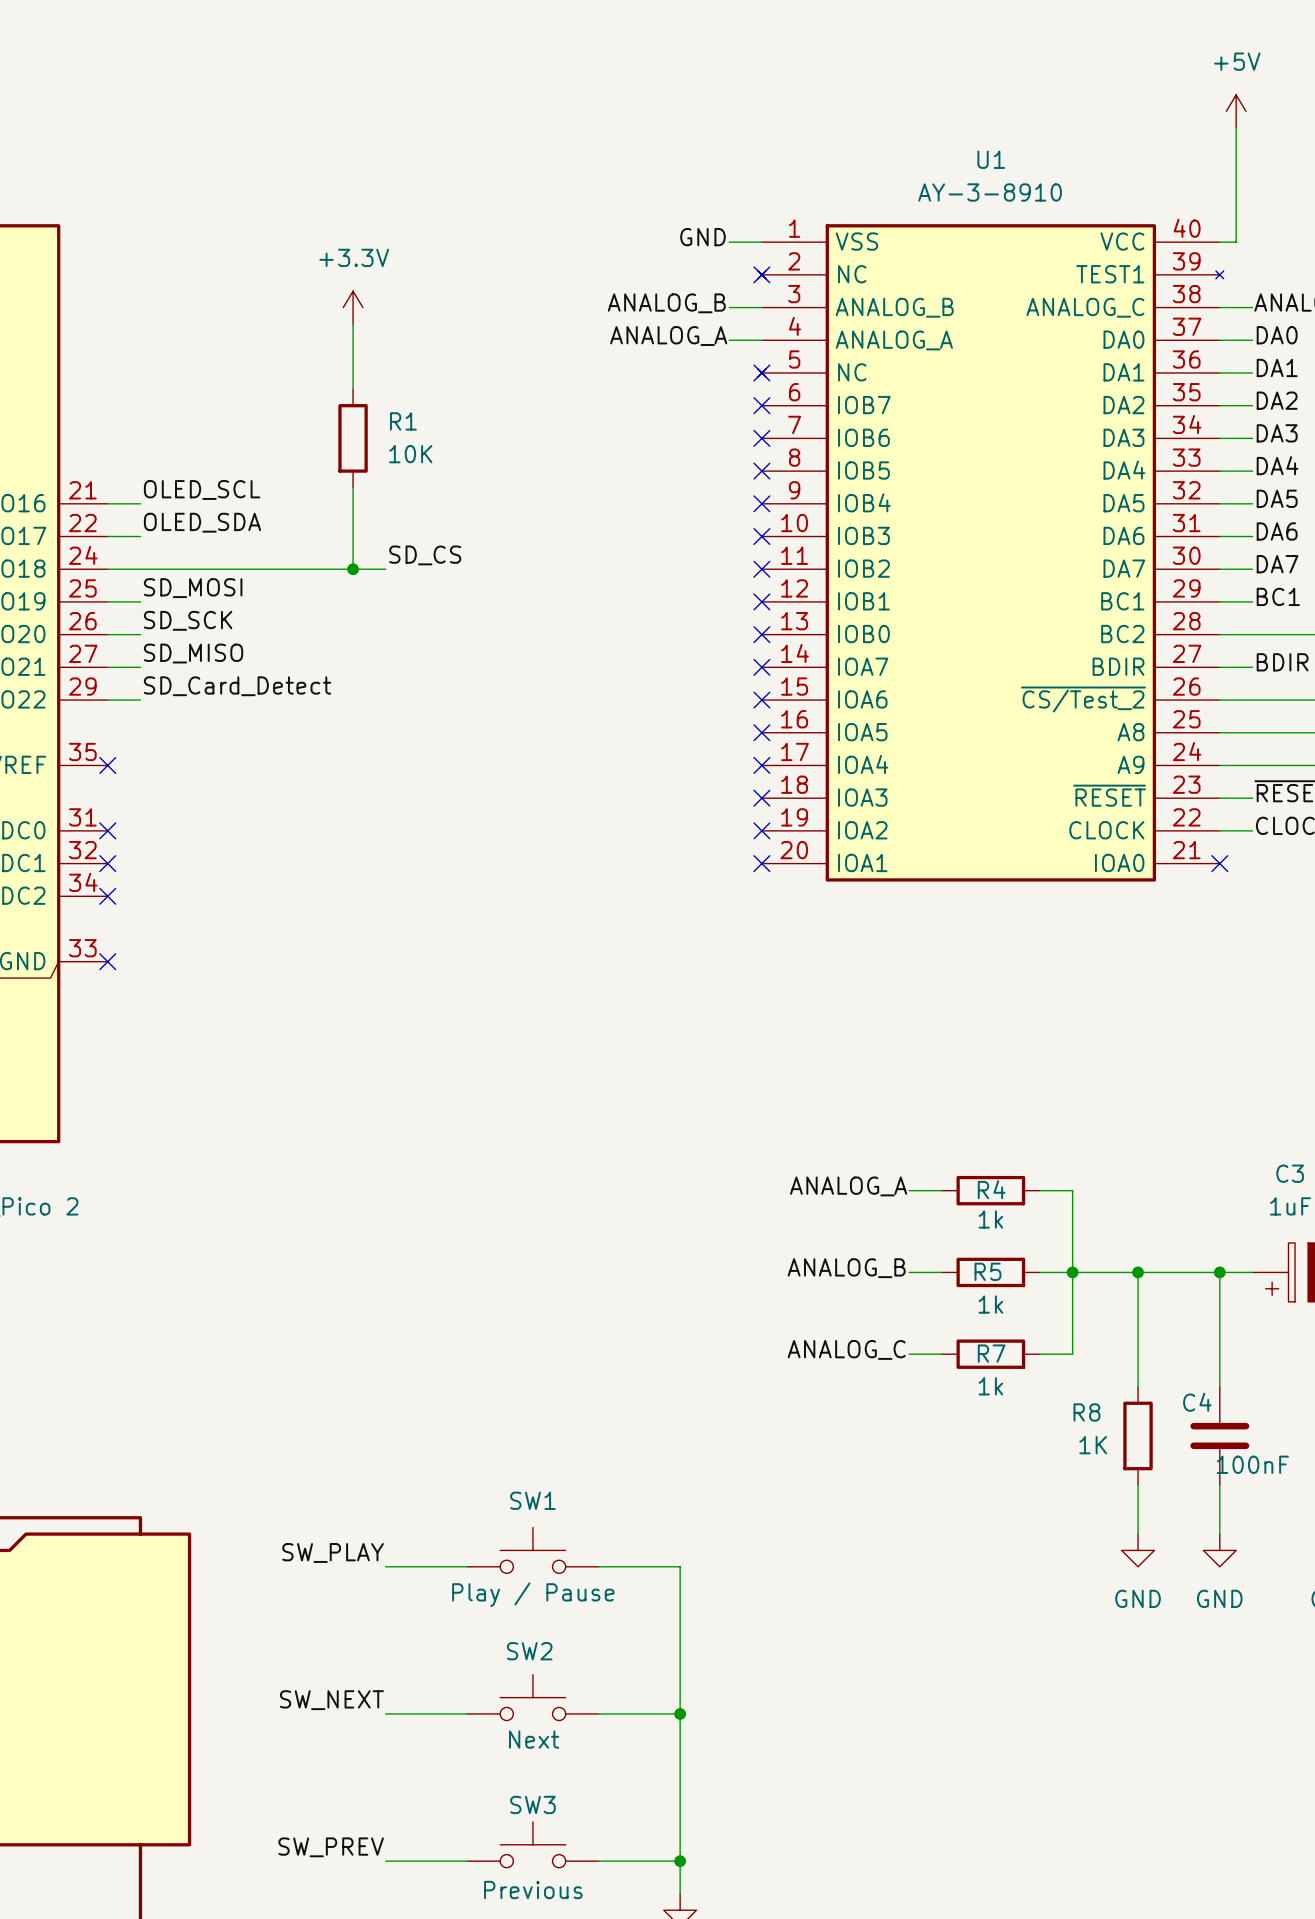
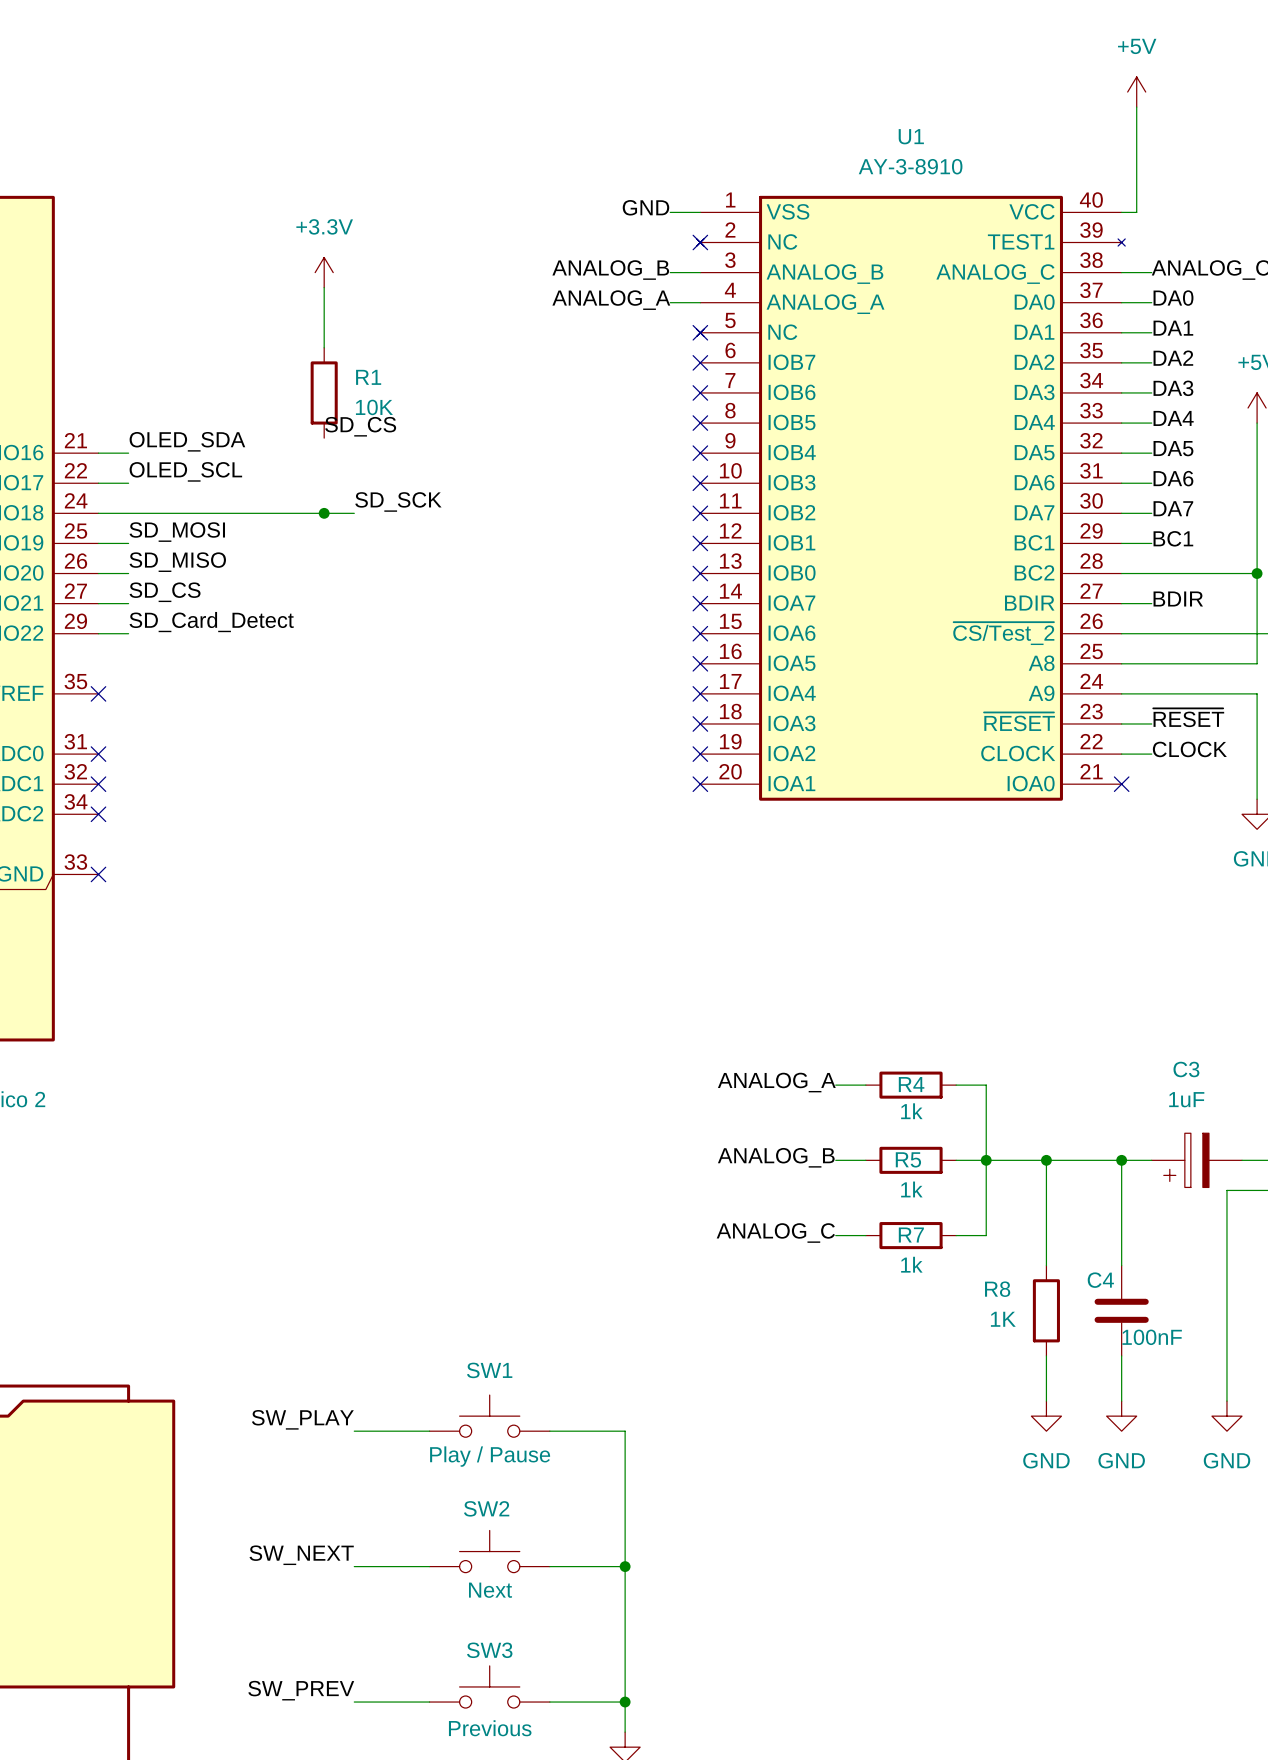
label: none -> SD_CS (360, 426)
wire: (353, 487) (353, 569) -> none
label: OLED_SCL (202, 489) -> OLED_SDA (187, 441)
label: OLED_SDA (202, 522) -> OLED_SCL (185, 471)
label: SD_CS (425, 555) -> SD_SCK (398, 501)
label: SD_SCK (188, 620) -> SD_MISO (177, 562)
label: SD_MISO (193, 653) -> SD_CS (165, 592)

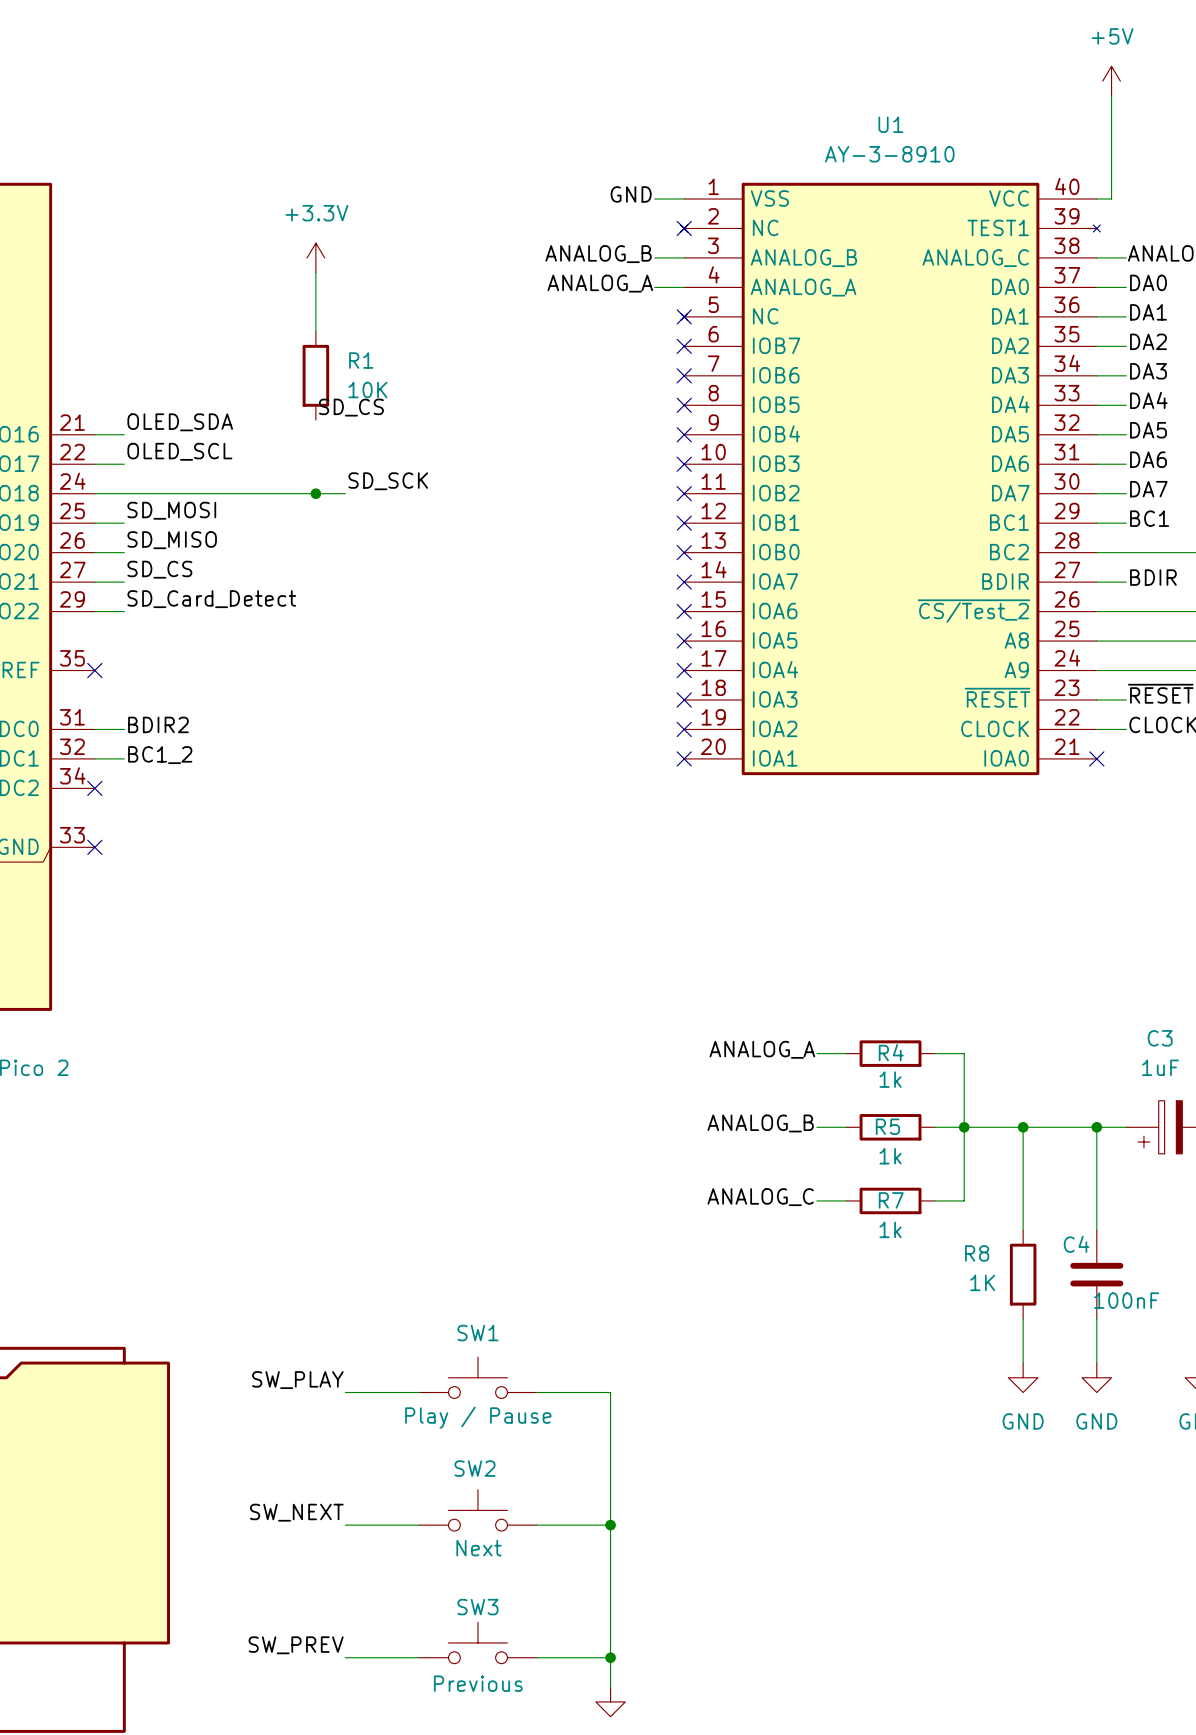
label: none -> BDIR2 (158, 724)
wire: none -> (94, 729) (124, 729)
no-connect mark: (98, 754) -> none
label: none -> BC1_2 (160, 755)
wire: none -> (94, 758) (124, 758)
no-connect mark: (98, 784) -> none

